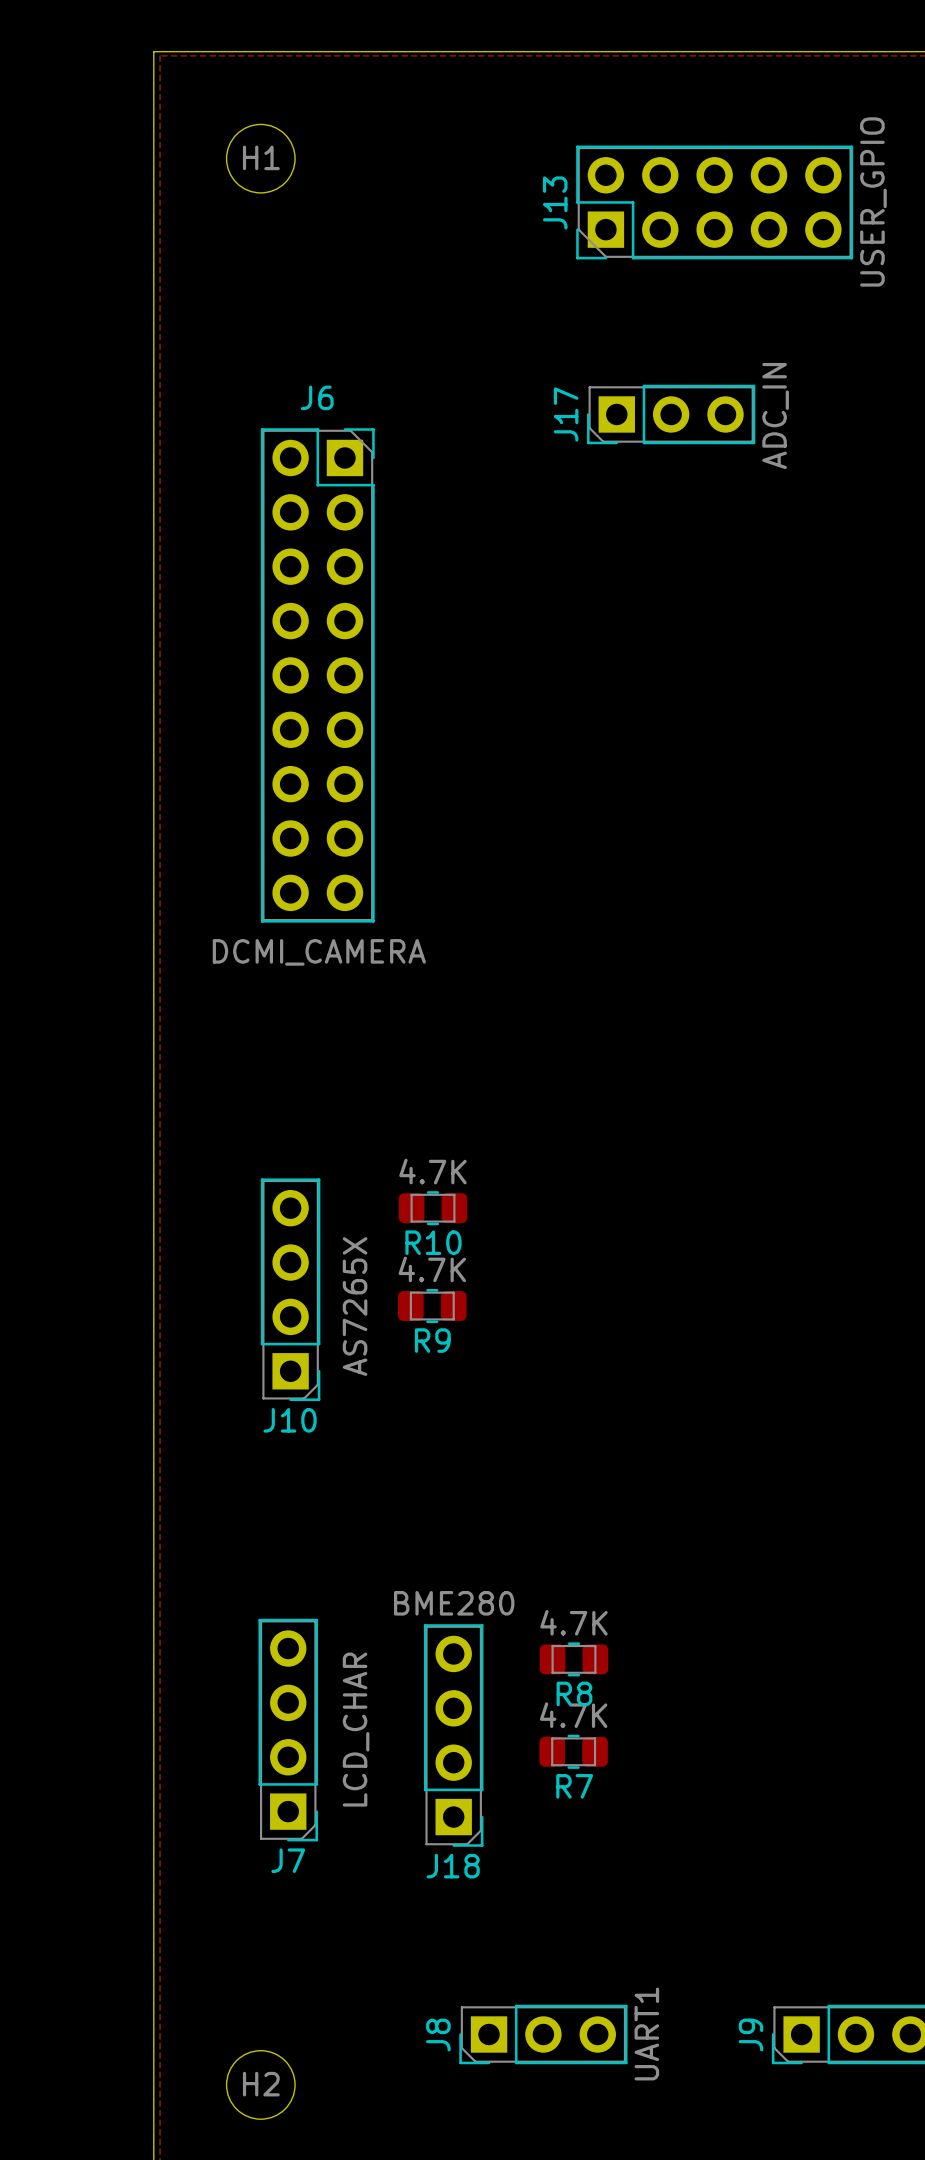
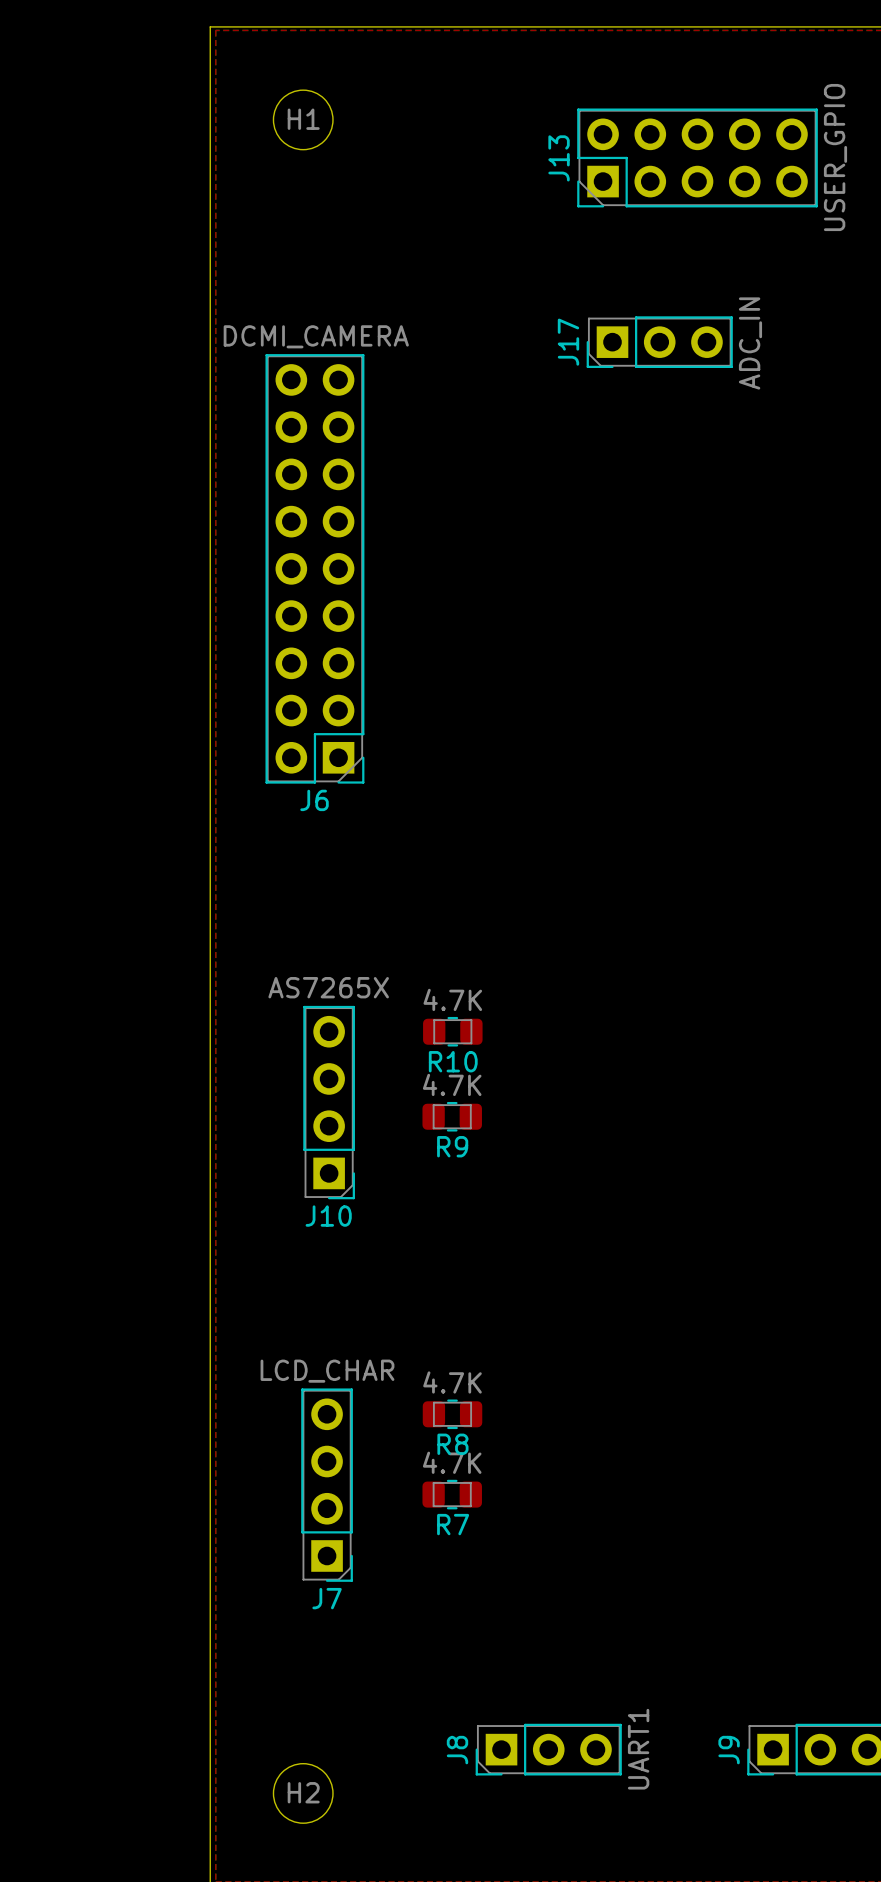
J6 name position: J6 (317, 397) -> J6 (314, 800)
J6 footprint: [260, 428, 375, 923] -> [265, 354, 365, 784]
J6 value position: DCMI_CAMERA (319, 952) -> DCMI_CAMERA (316, 336)
J10 value rotation: 0° (355, 1306) -> 90° clockwise (328, 987)
J10 value position: AS7265X (355, 1306) -> AS7265X (328, 987)
R8 position: (573, 1659) -> (452, 1414)
J7 value rotation: 0° (356, 1729) -> 90° clockwise (327, 1371)
J18: BME280 (453, 1735) -> none
R7 position: (573, 1751) -> (452, 1494)

